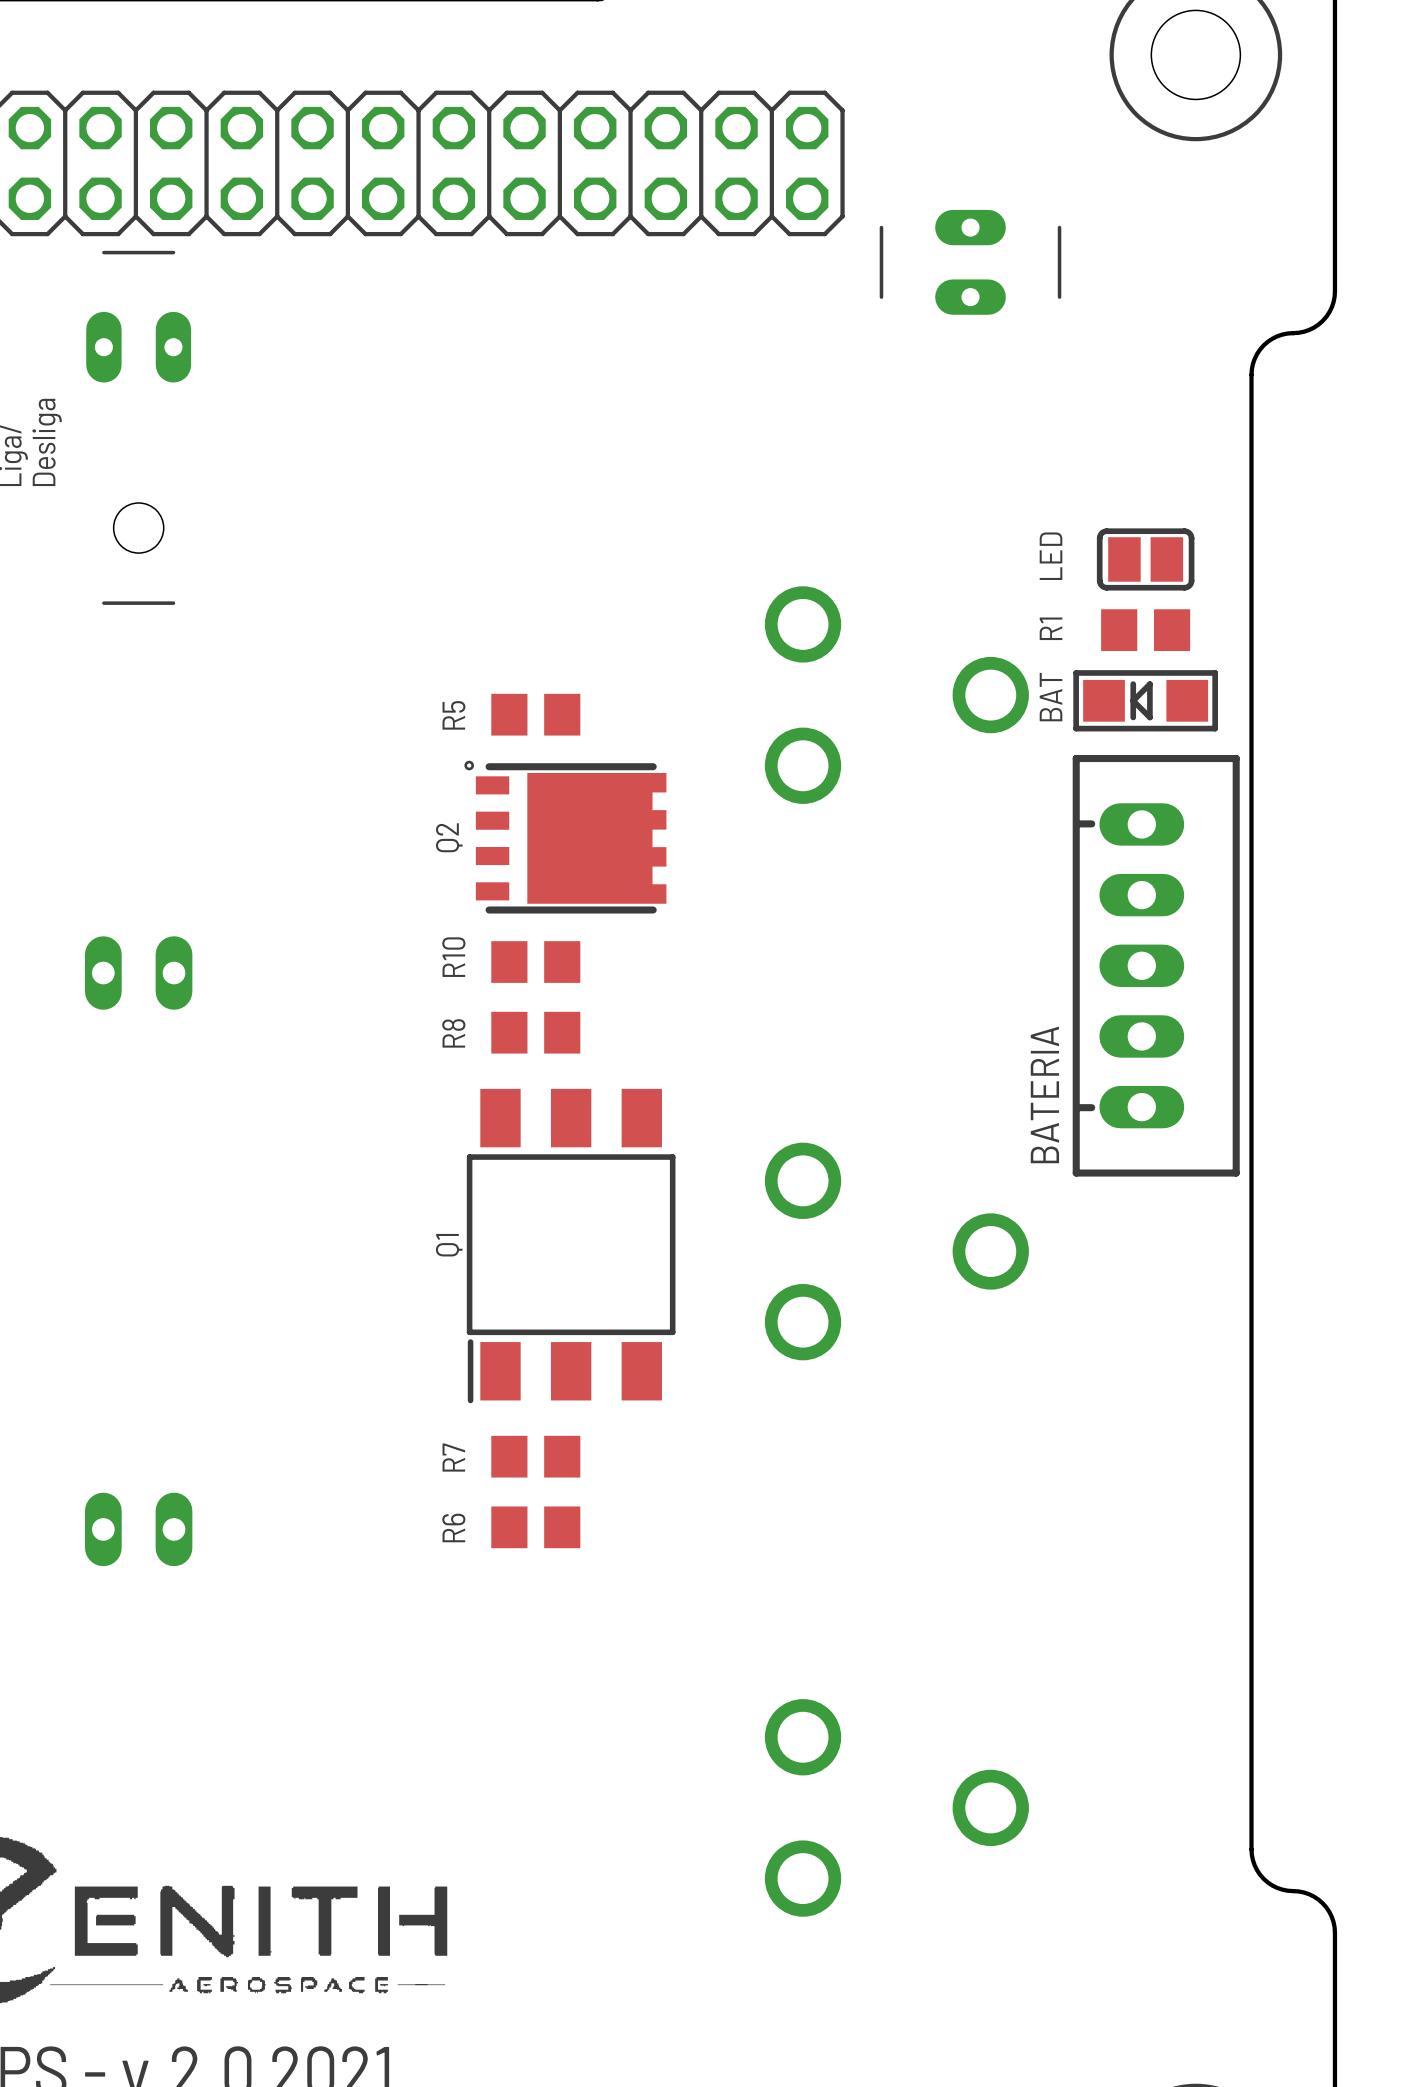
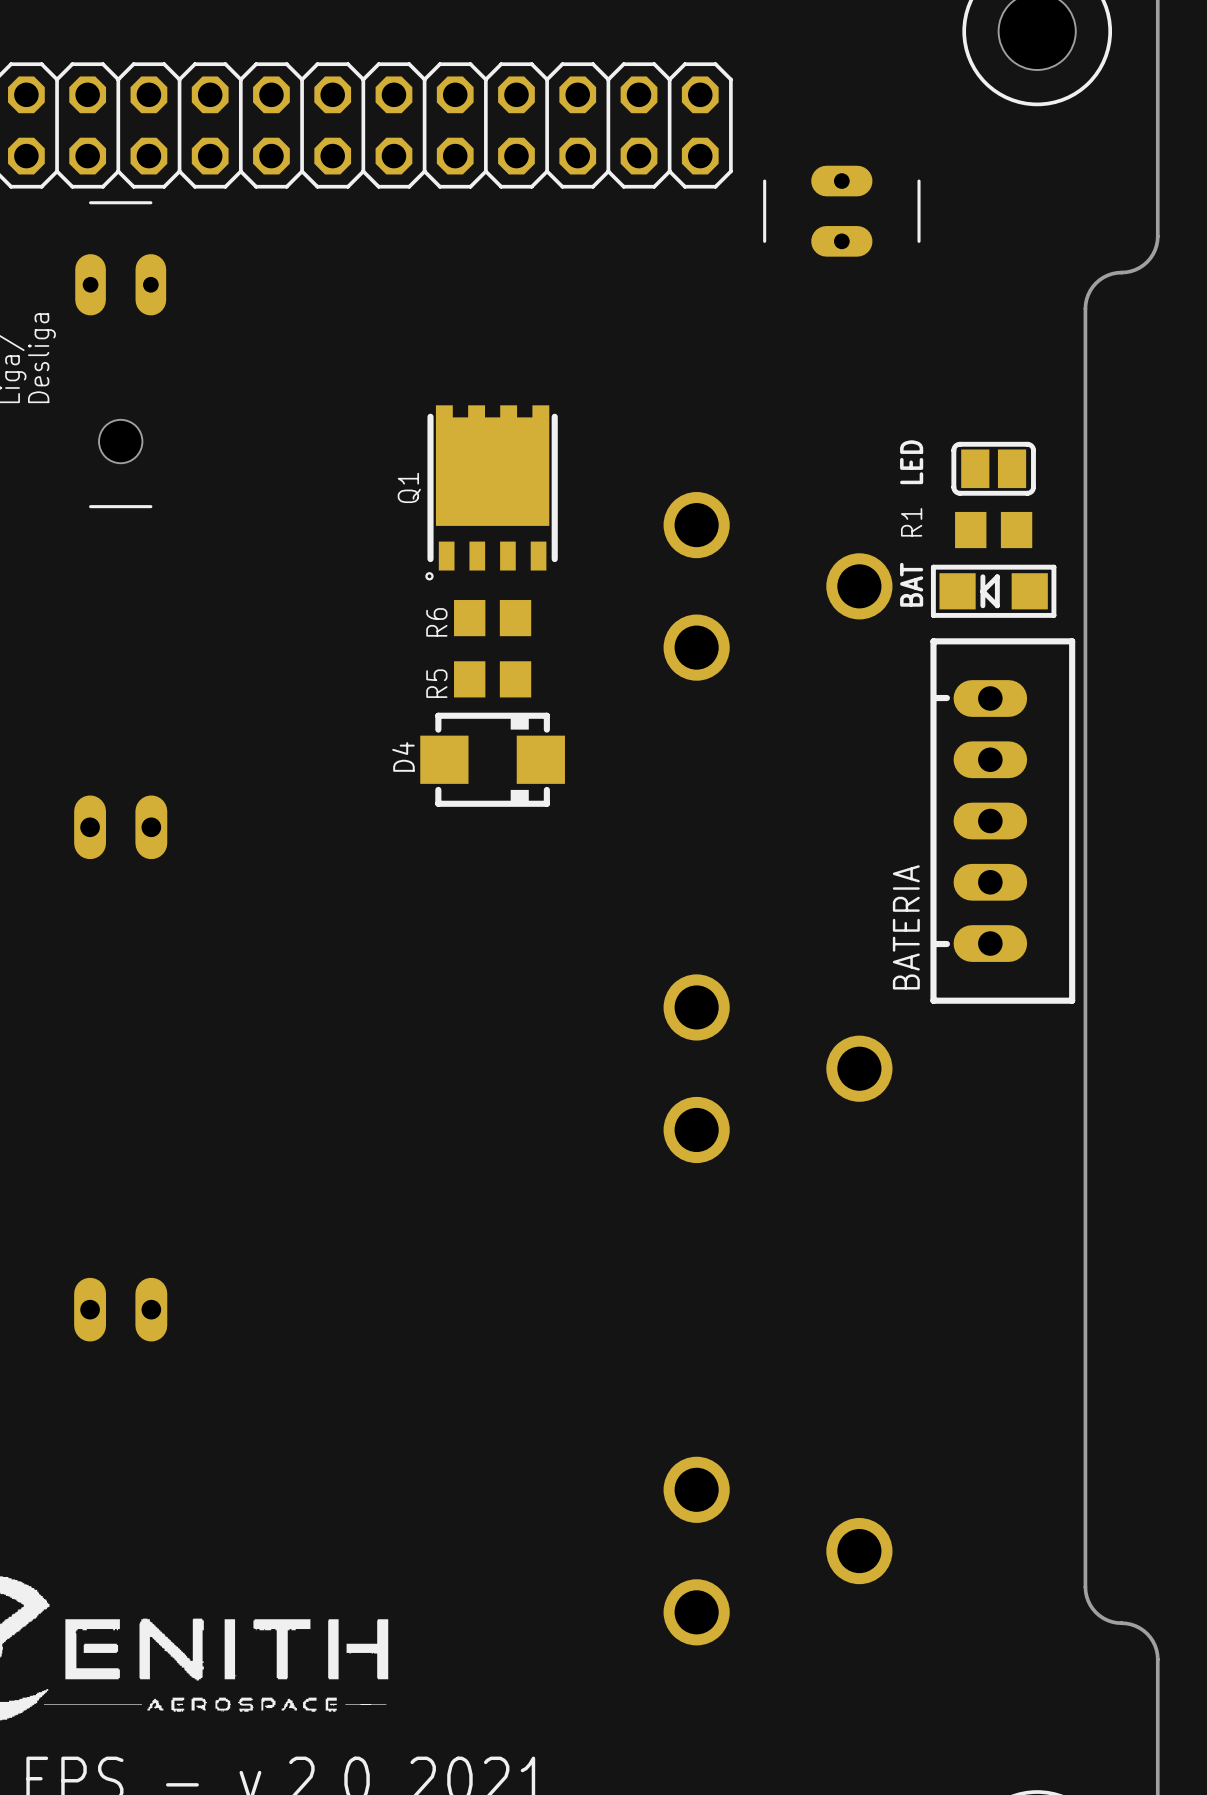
R5 position: (535, 714) -> (492, 679)
R5 name position: R5 (453, 715) -> R5 (436, 683)
Q2: (565, 837) -> none
D4: none -> (492, 759)
R10: (535, 962) -> none
R8: (535, 1032) -> none
Q1 footprint: [466, 1088, 676, 1404] -> [425, 405, 558, 581]
R7: (535, 1456) -> none
R6 name position: R6 (453, 1527) -> R6 (436, 622)
R6 position: (535, 1527) -> (492, 618)

